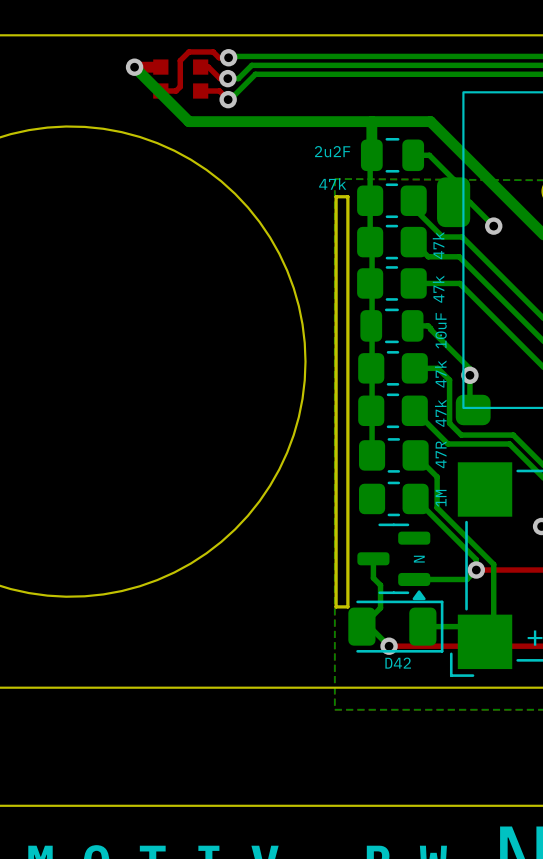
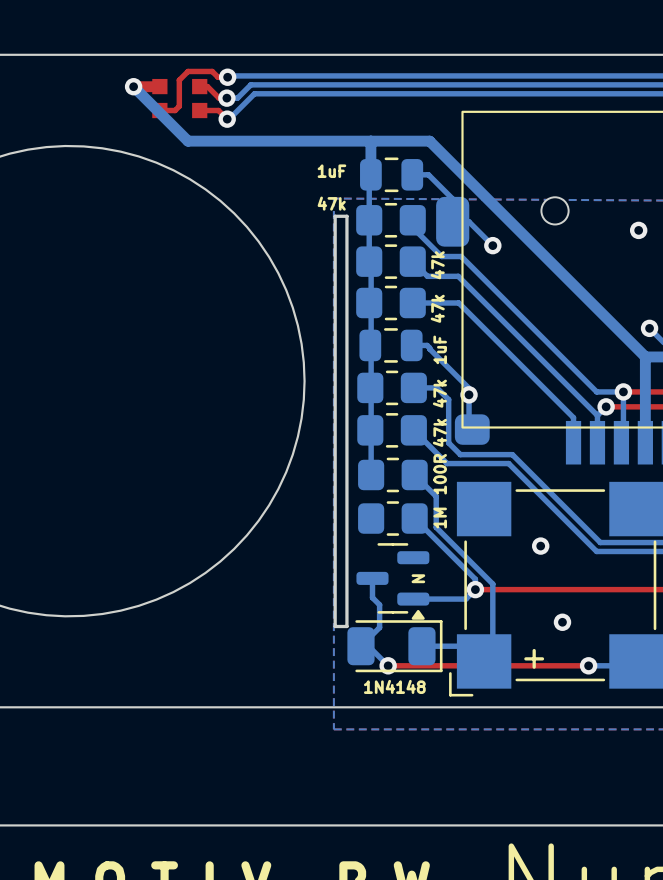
text: 2u2F (332, 151) -> 1uF (331, 171)
text: 10uF (441, 330) -> 1uF (440, 349)
text: 47R (441, 454) -> 100R (440, 474)
text: D42 (398, 663) -> 1N4148 (394, 686)

